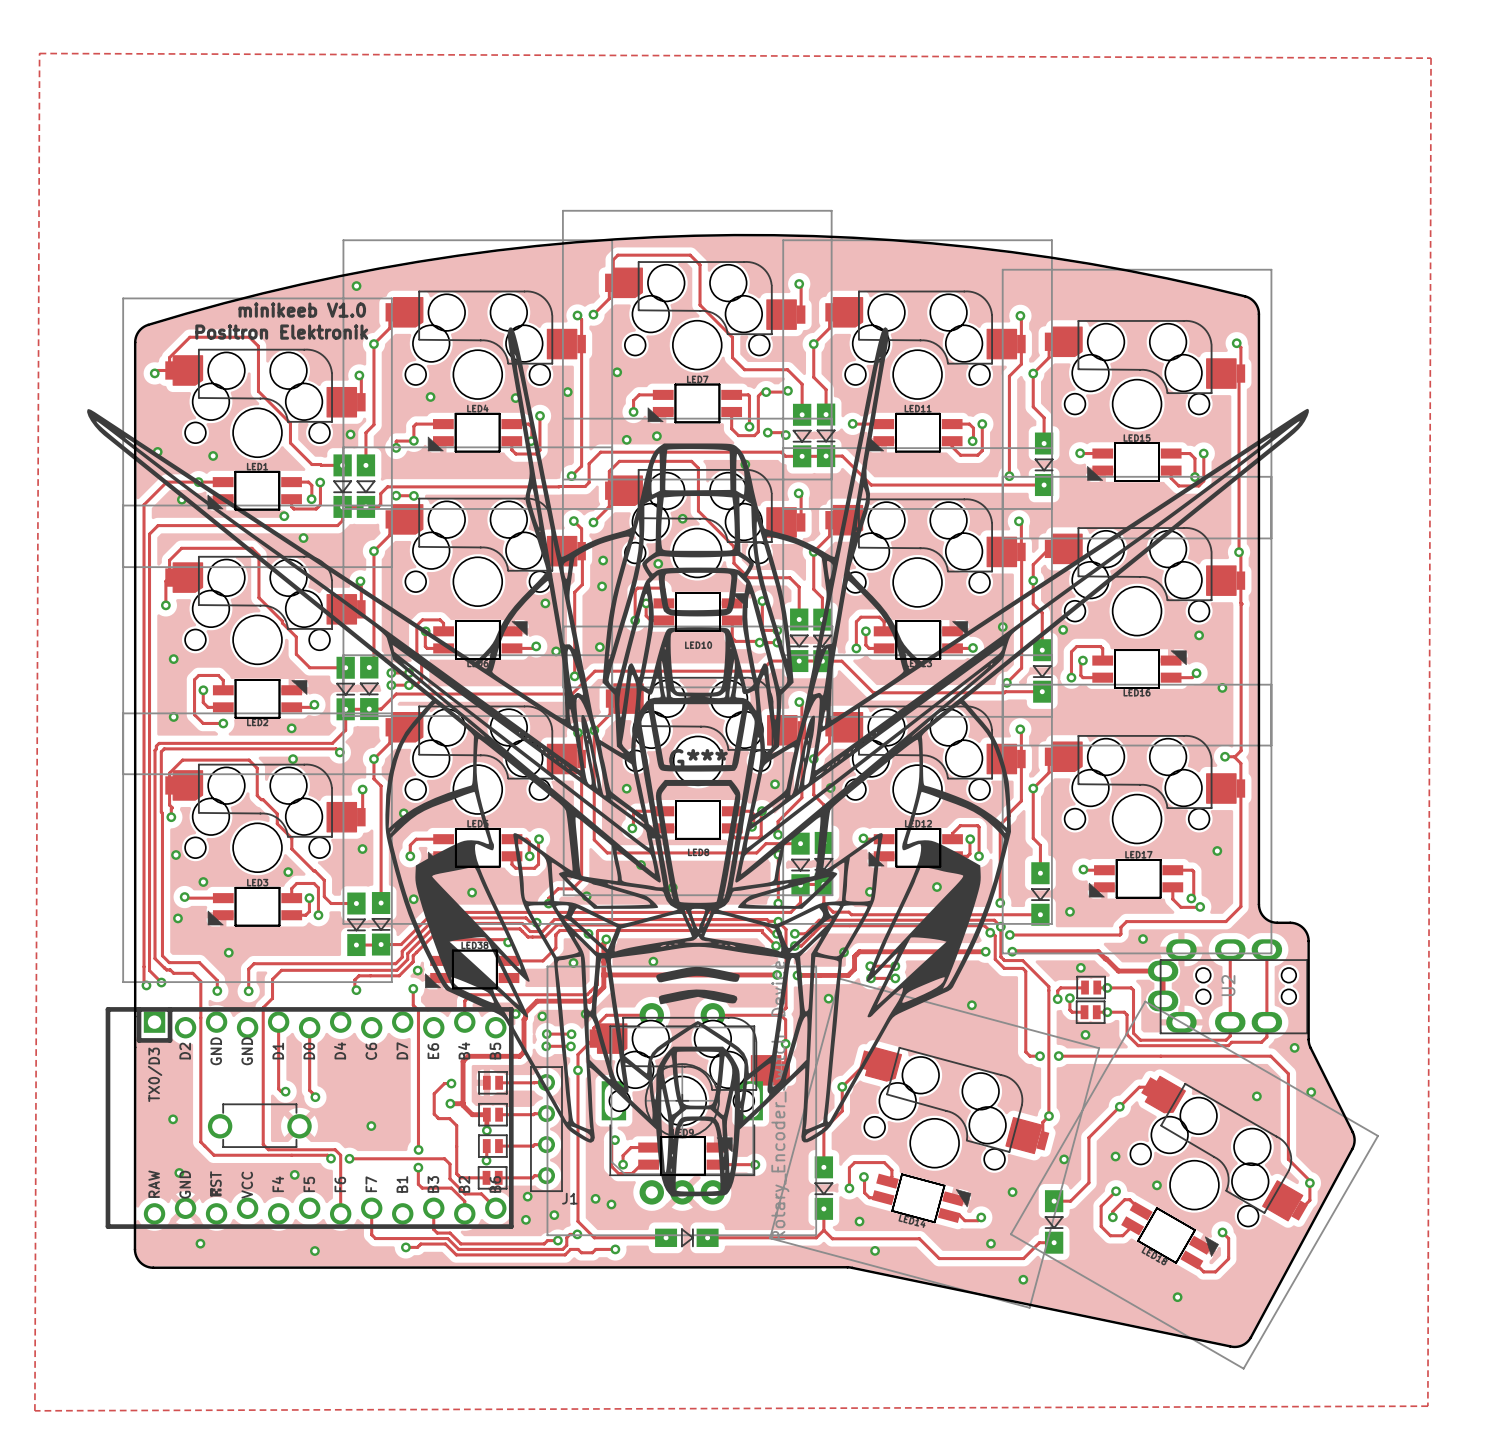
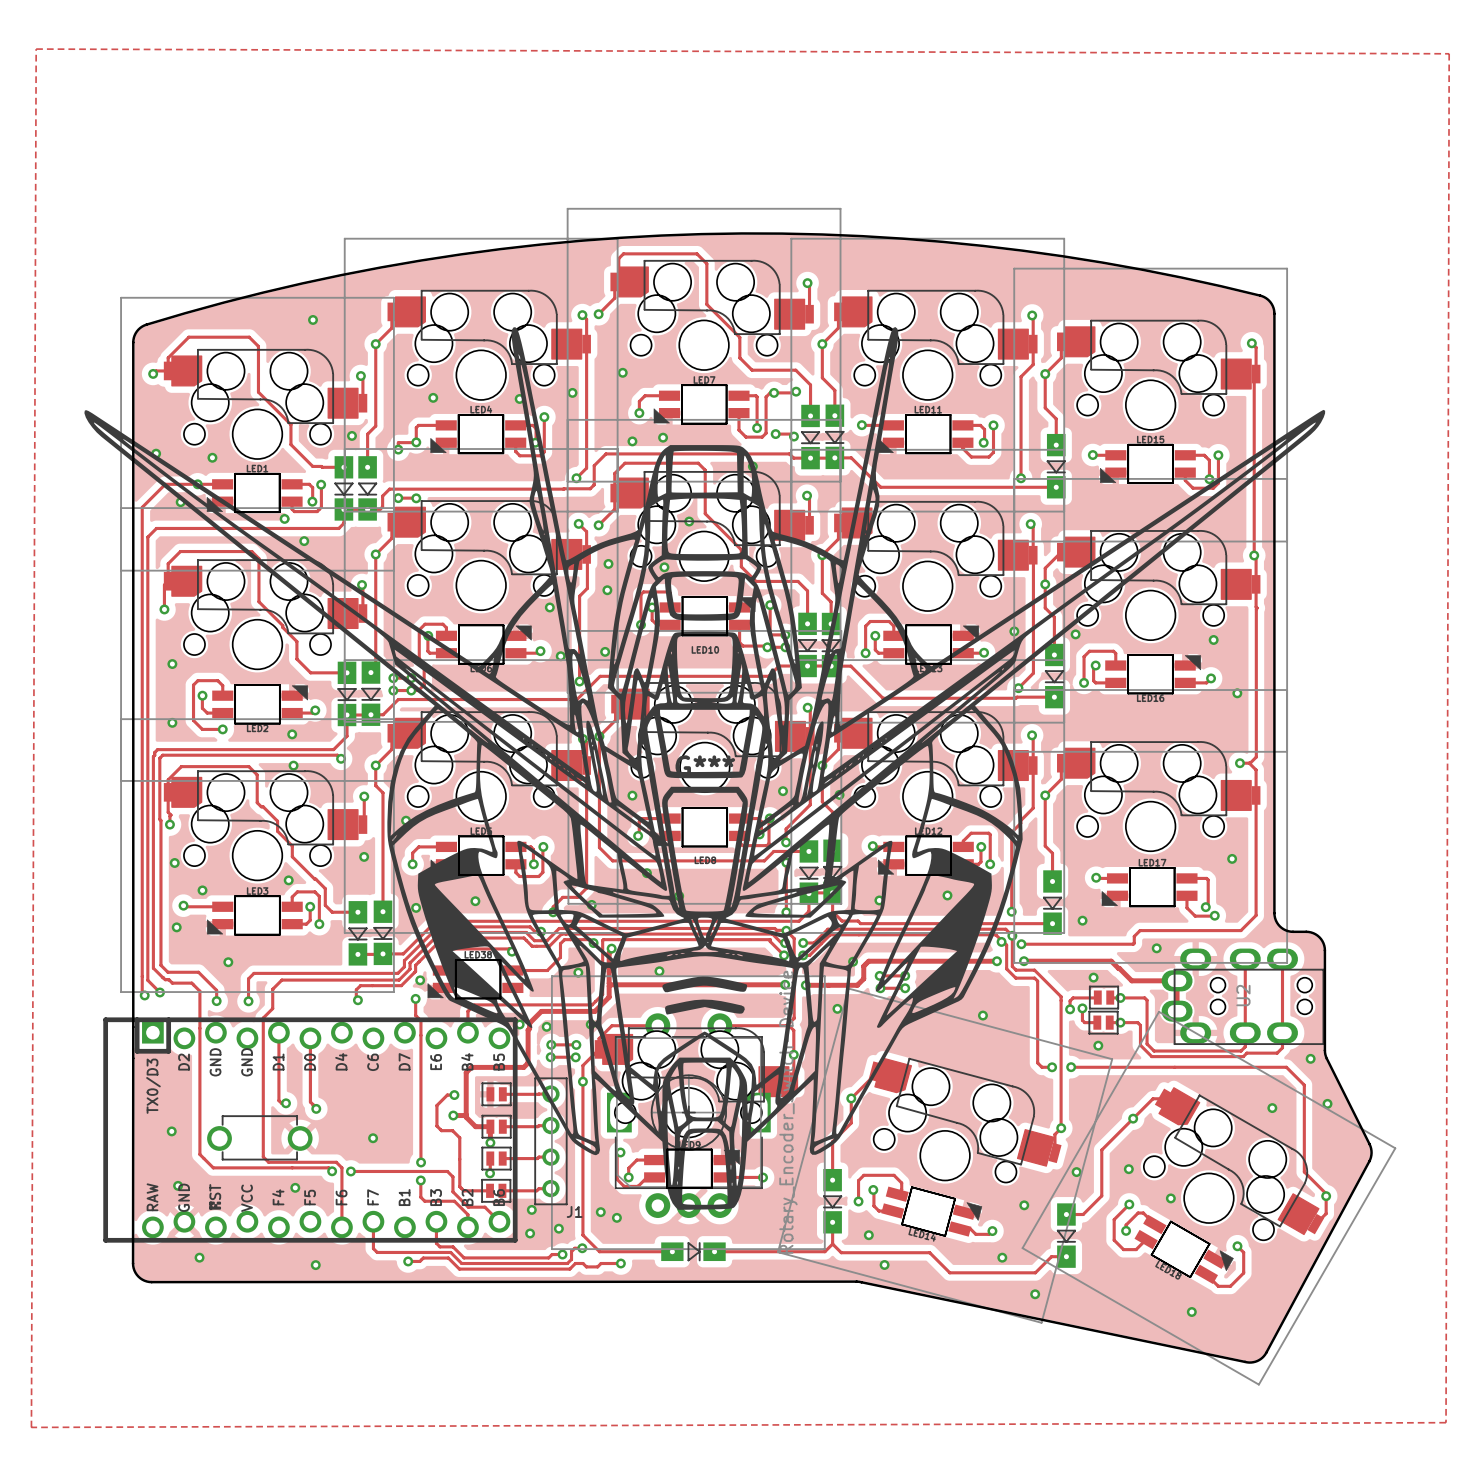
via position: (356, 286) -> (313, 319)
text: minikeeb V1.0 (302, 310) -> none
text: Positron Elektronik (281, 332) -> none

